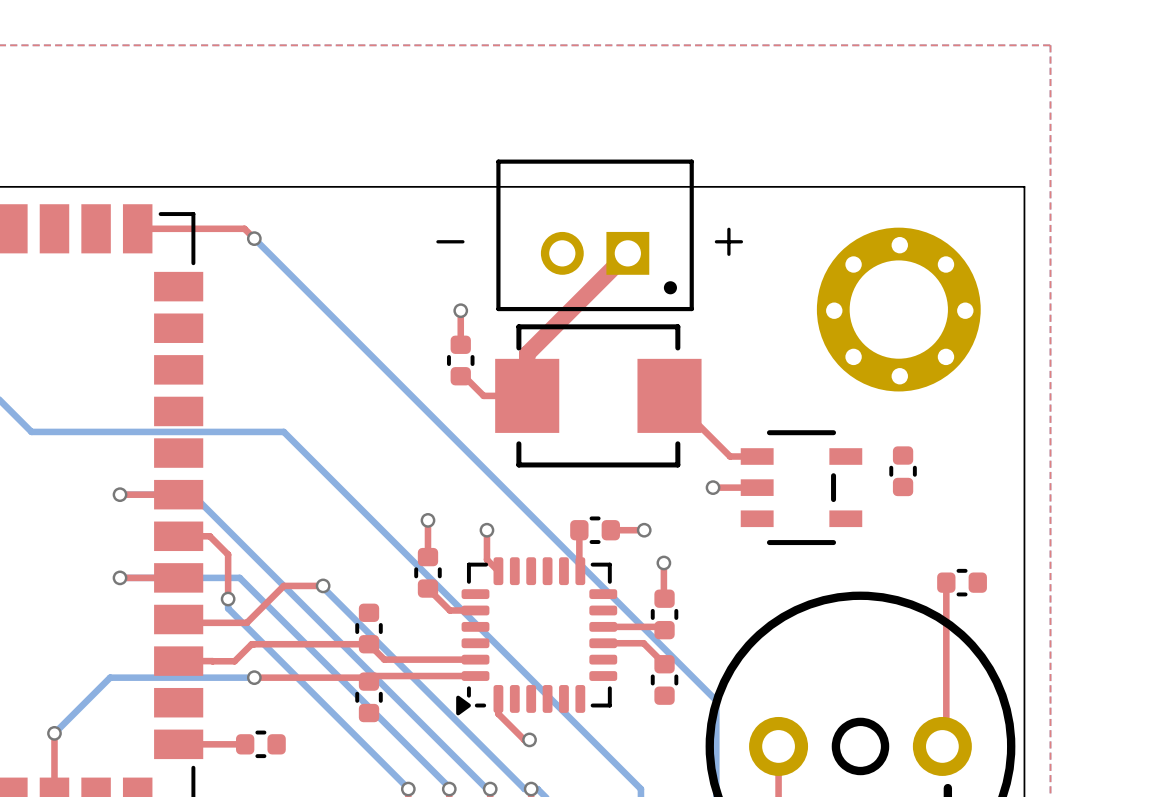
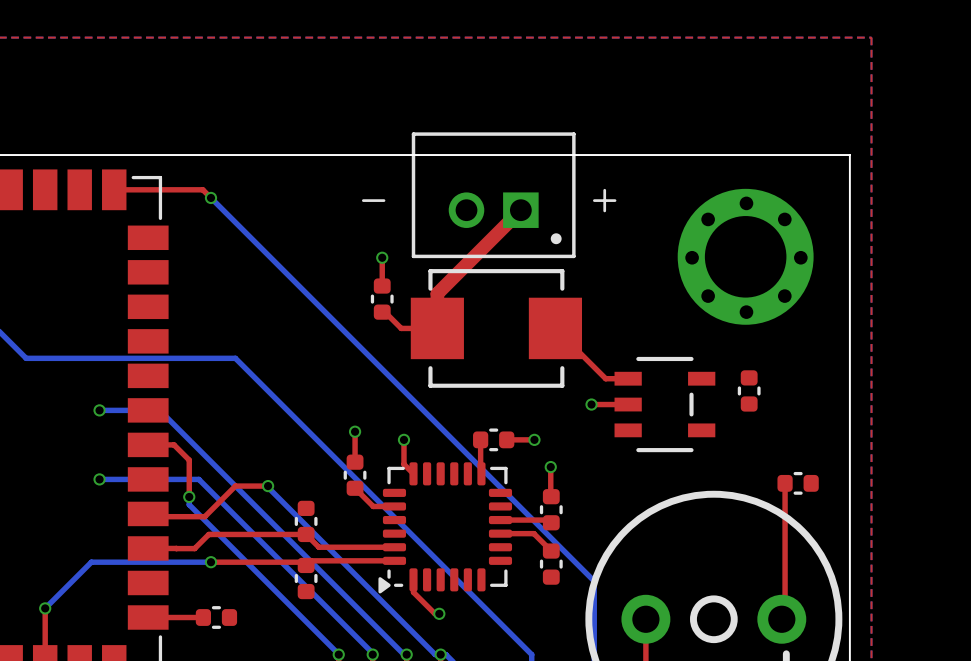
top track: (120, 494) (178, 494) -> none
top track: (120, 577) (178, 577) -> none

